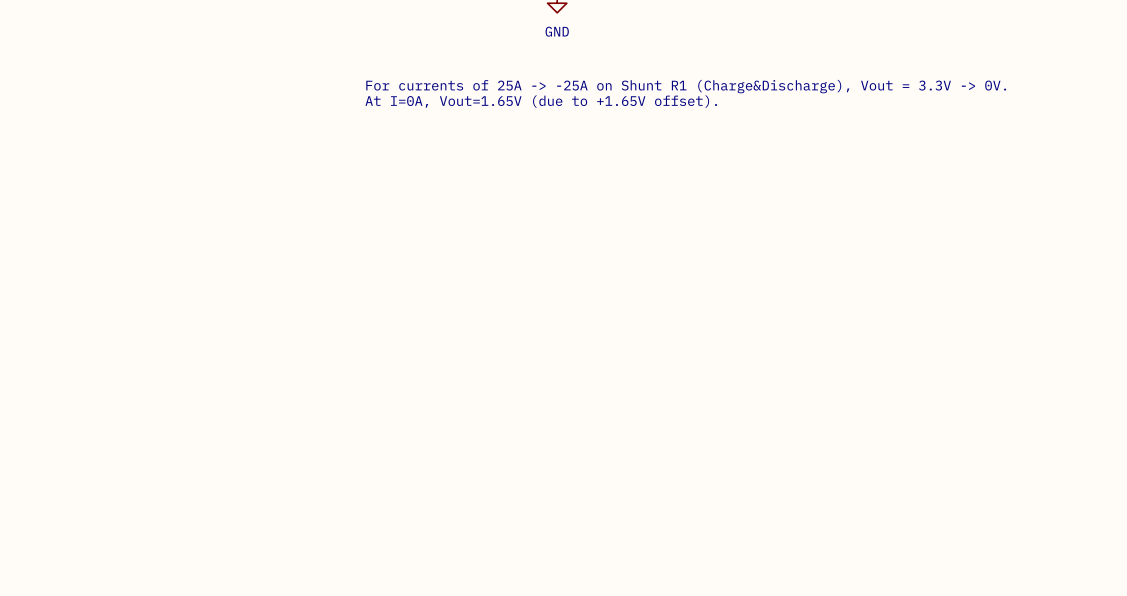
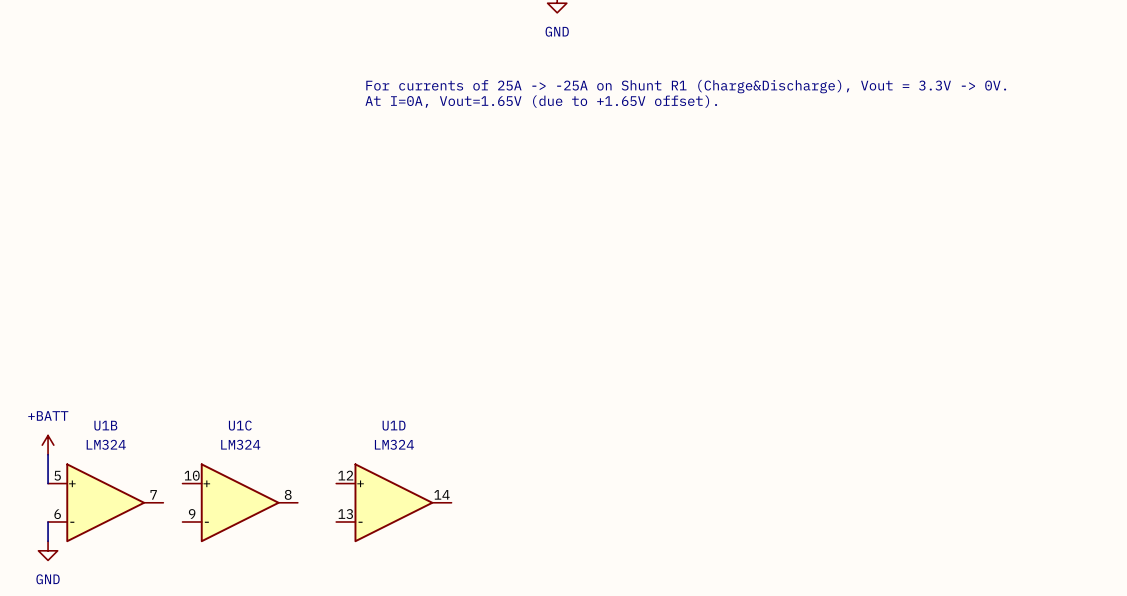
power symbol: none -> +BATT (48, 445)
wire: none -> (48, 454) (48, 483)
U1B: none -> LM324 (105, 502)
U1C: none -> LM324 (240, 502)
U1D: none -> LM324 (393, 502)
wire: none -> (48, 522) (48, 541)
power symbol: none -> GND (48, 550)

